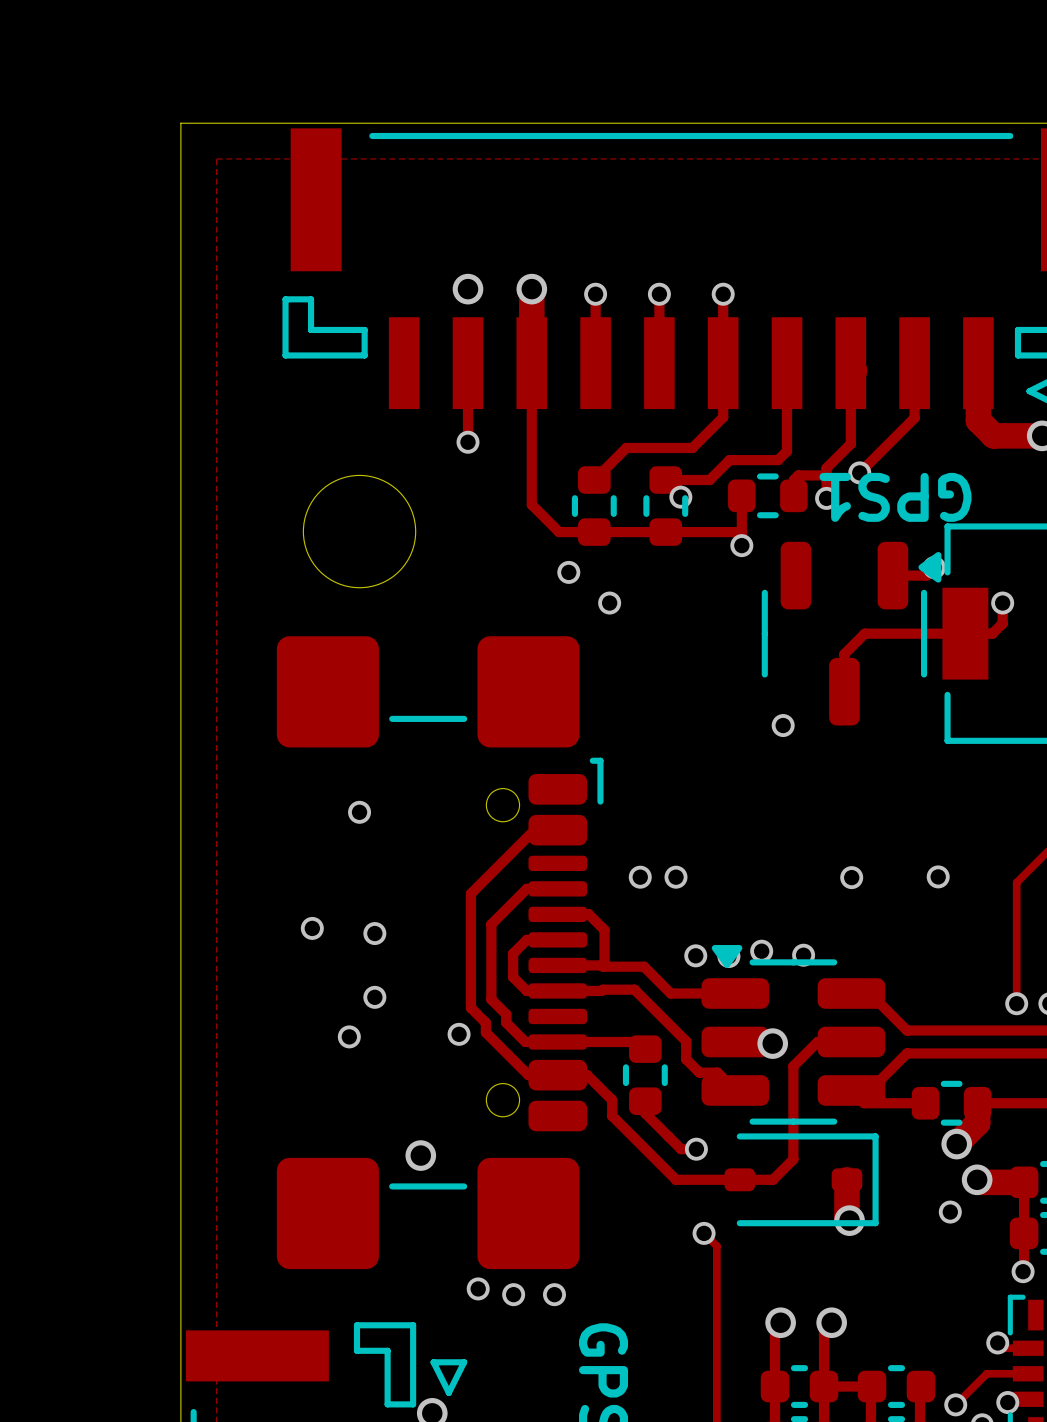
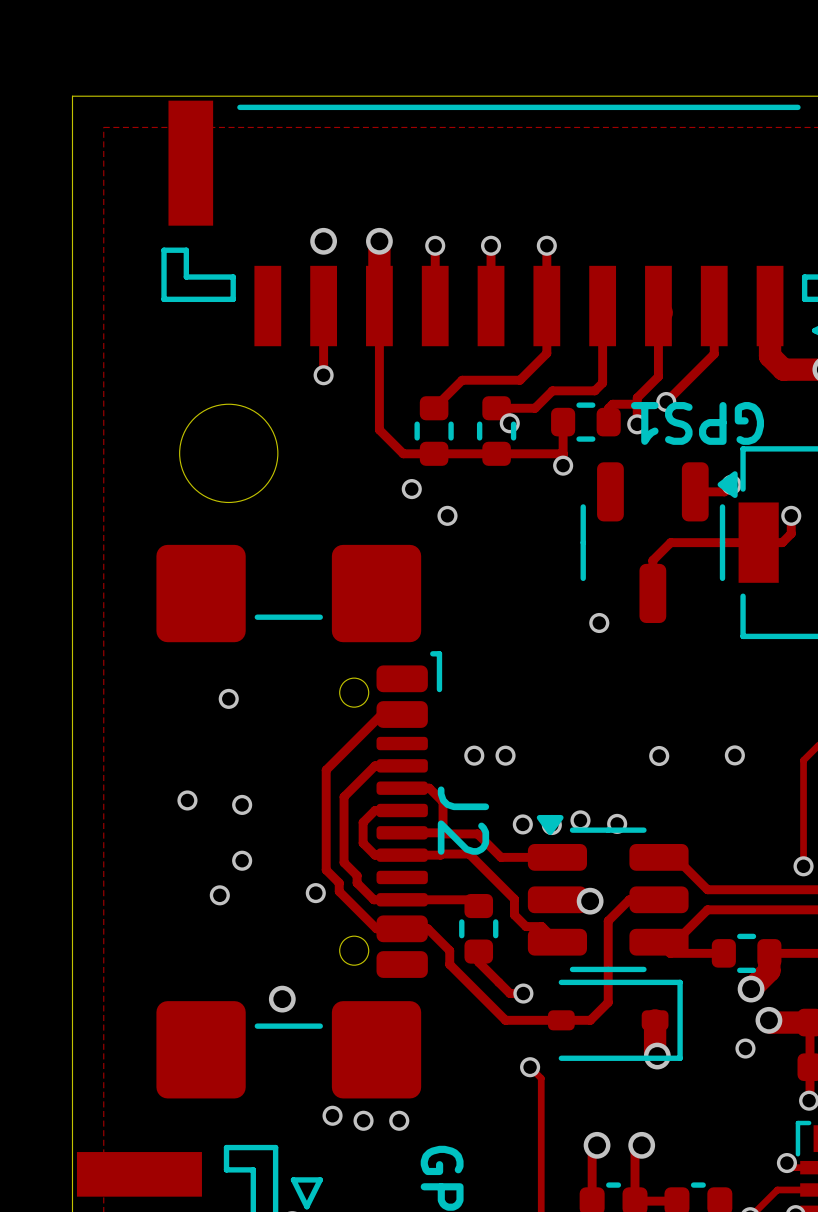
J2 name: none -> J2 (463, 820)

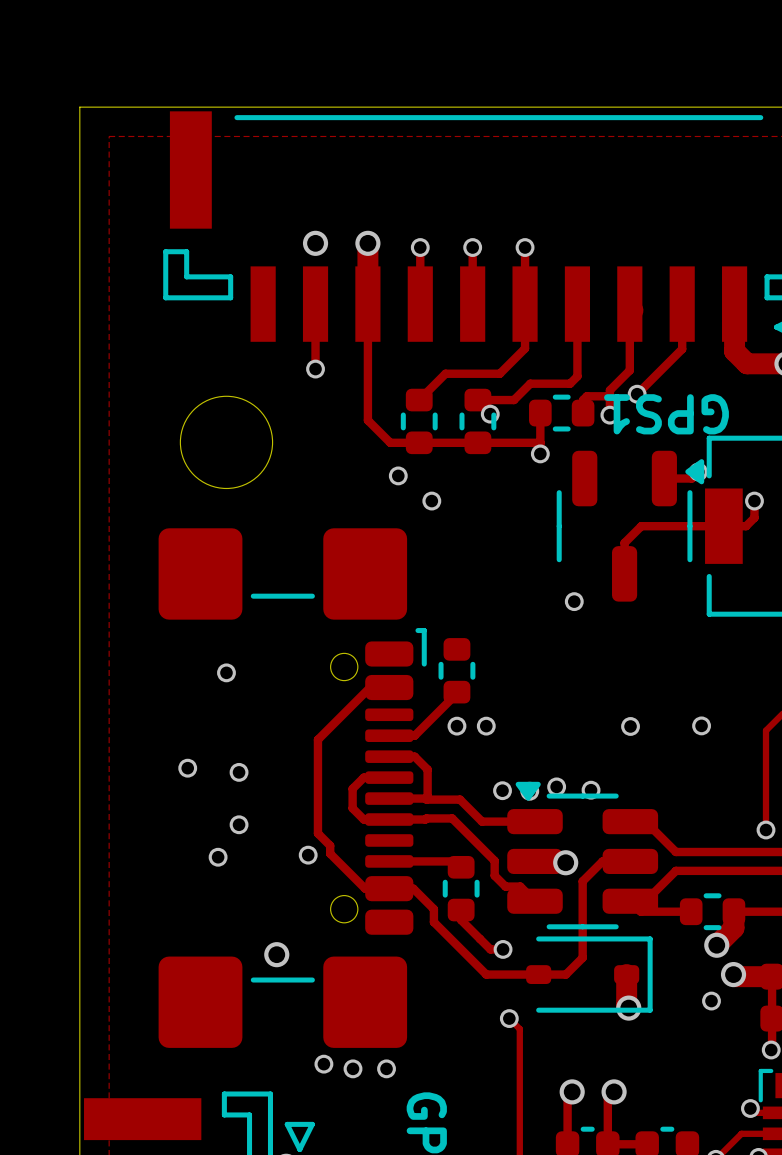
part: none -> (456, 670)
track: (402, 765) (375, 765) (344, 796) (344, 862) (357, 875) (357, 883) (373, 899) (402, 899) -> (389, 735) (414, 735) (456, 692)
J2 name: J2 (463, 820) -> none

